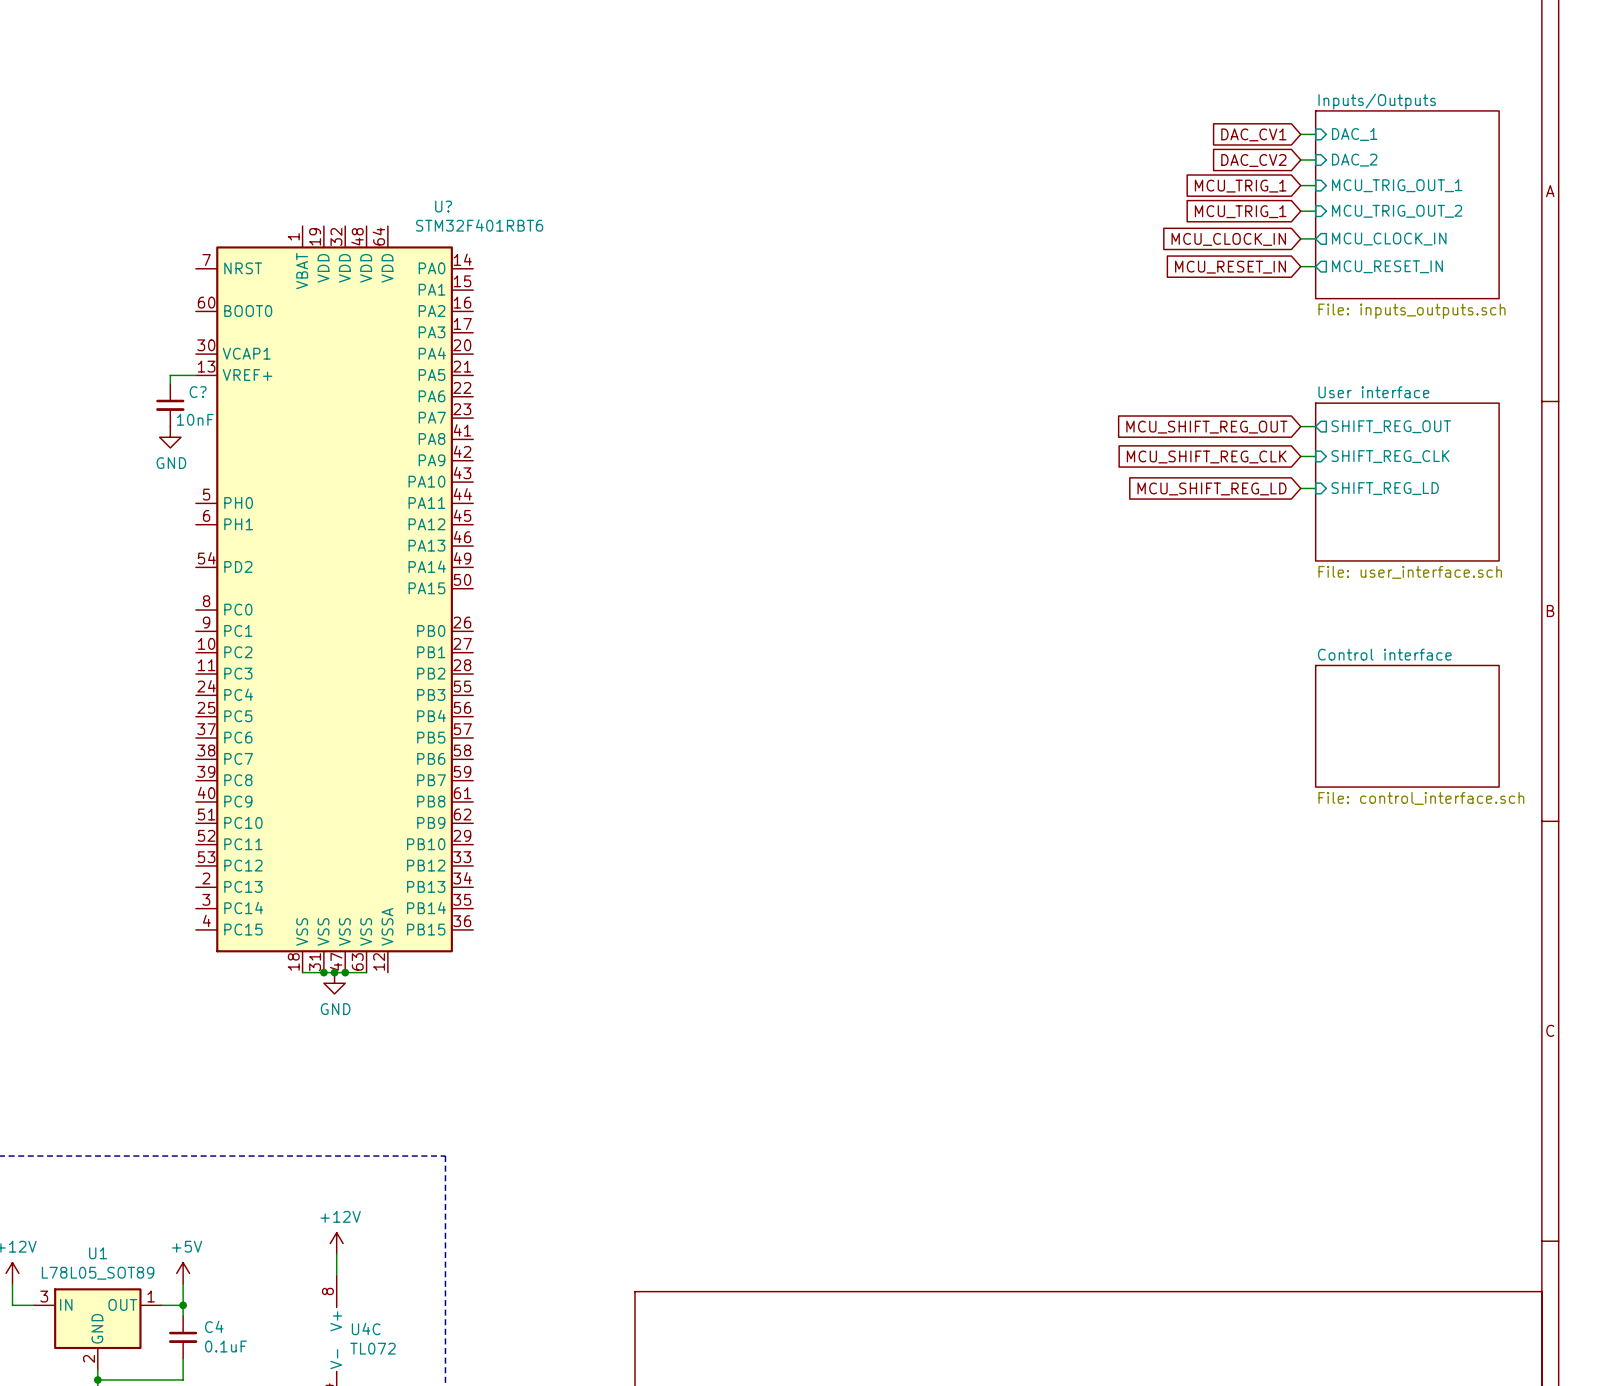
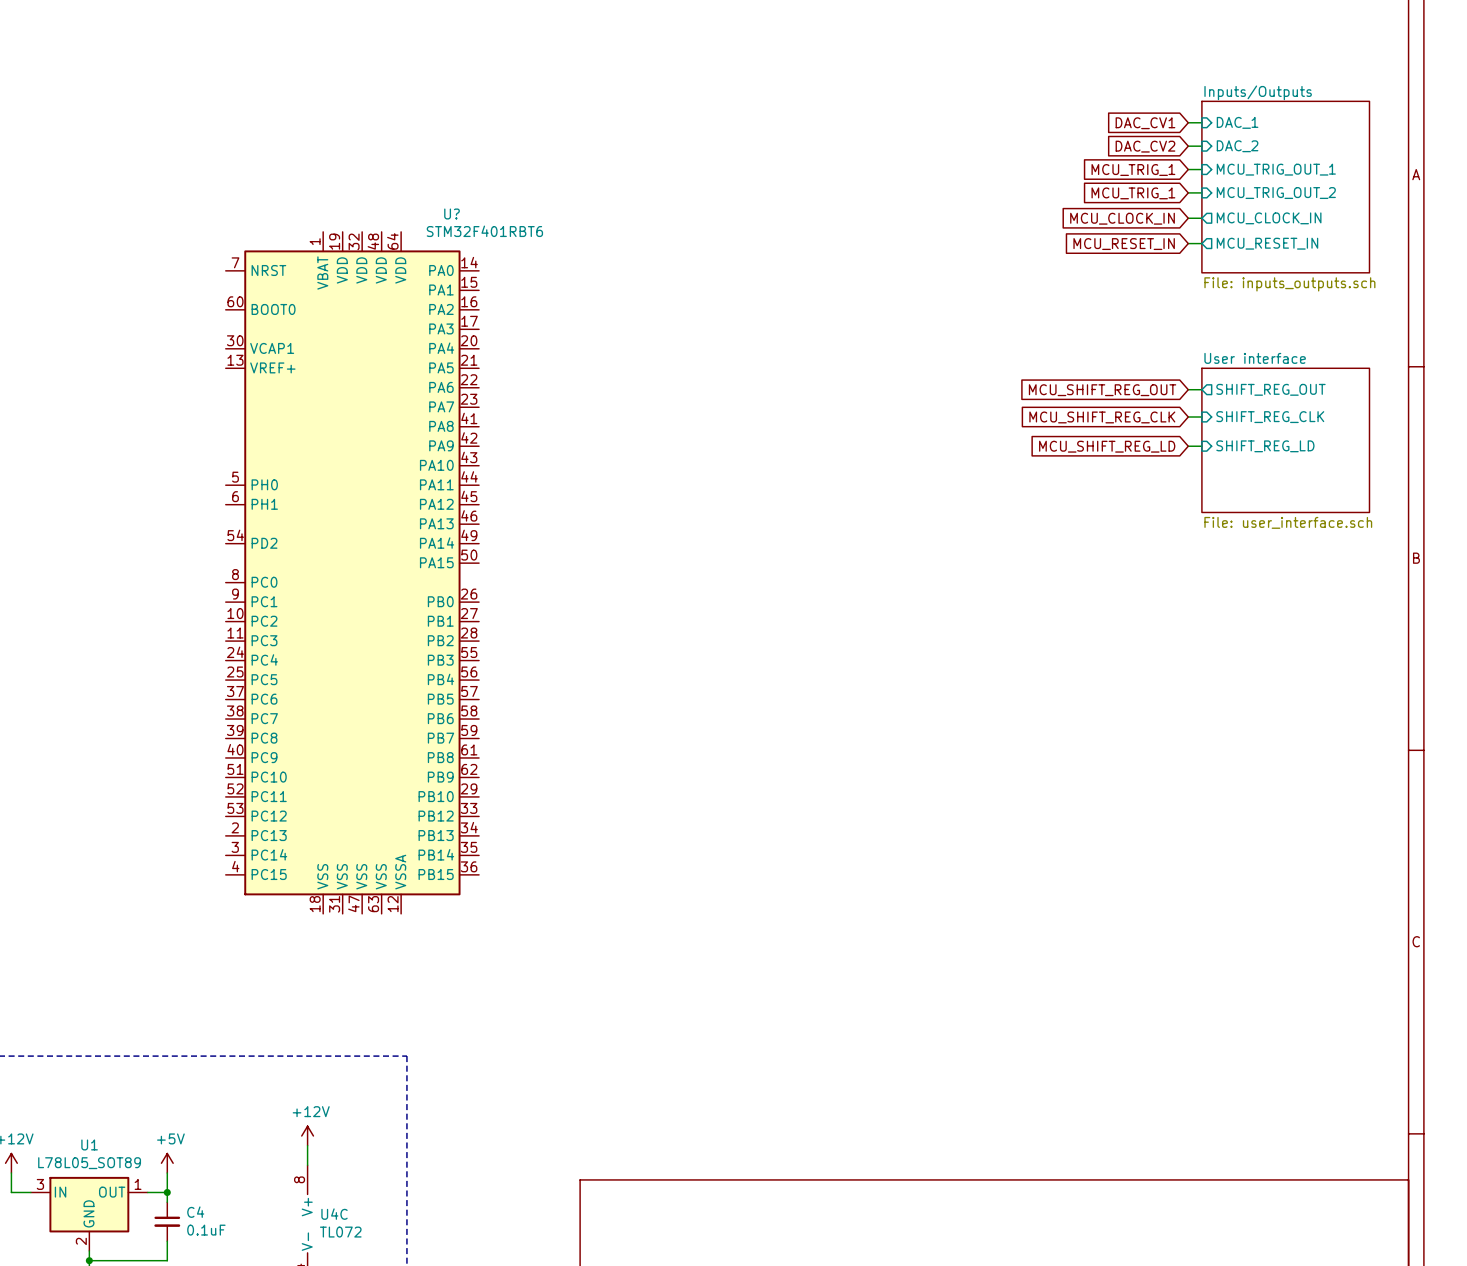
wire: (195, 375) (170, 375) (170, 383) -> none
C?: 10nF (170, 405) -> none
power symbol: GND (170, 437) -> none
U? position: (334, 599) -> (352, 572)
sheet Control interface: File: control_interface.sch (1407, 726) -> none
junction: (323, 972) -> none
junction: (334, 972) -> none
junction: (345, 972) -> none
power symbol: GND (334, 983) -> none

